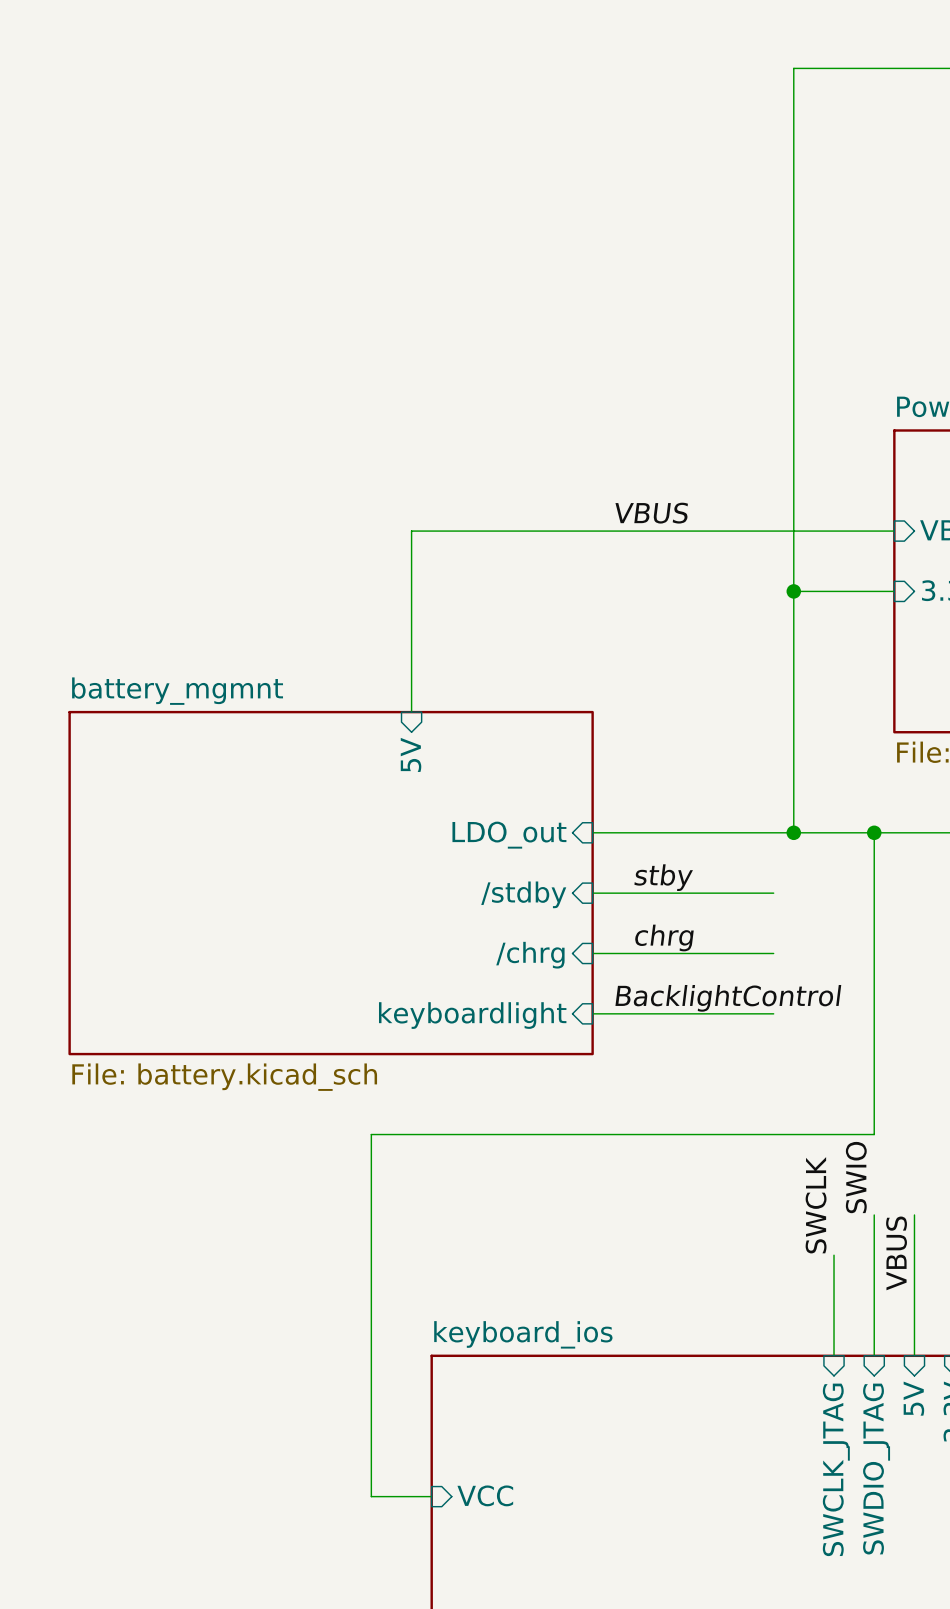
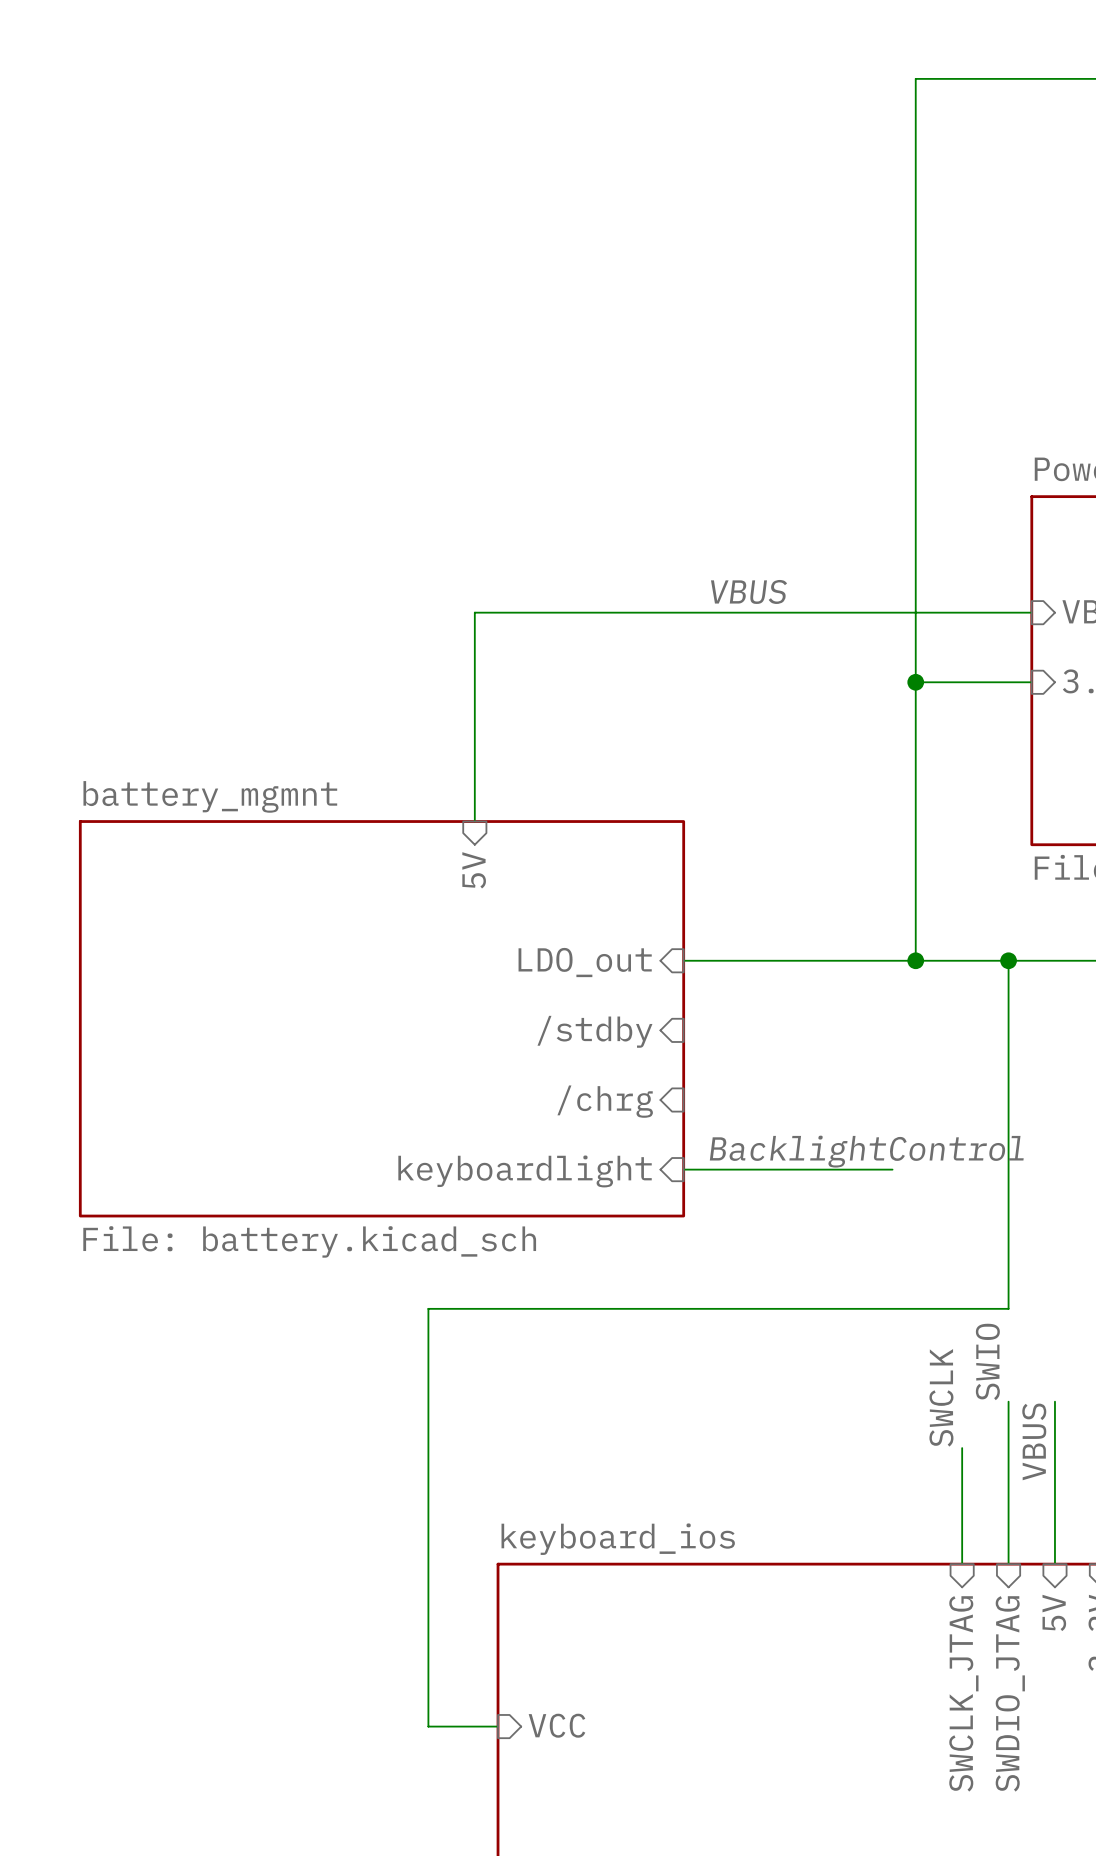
label: stby (663, 877) -> none
wire: (592, 893) (773, 893) -> none
label: chrg (664, 937) -> none
wire: (592, 953) (773, 953) -> none

